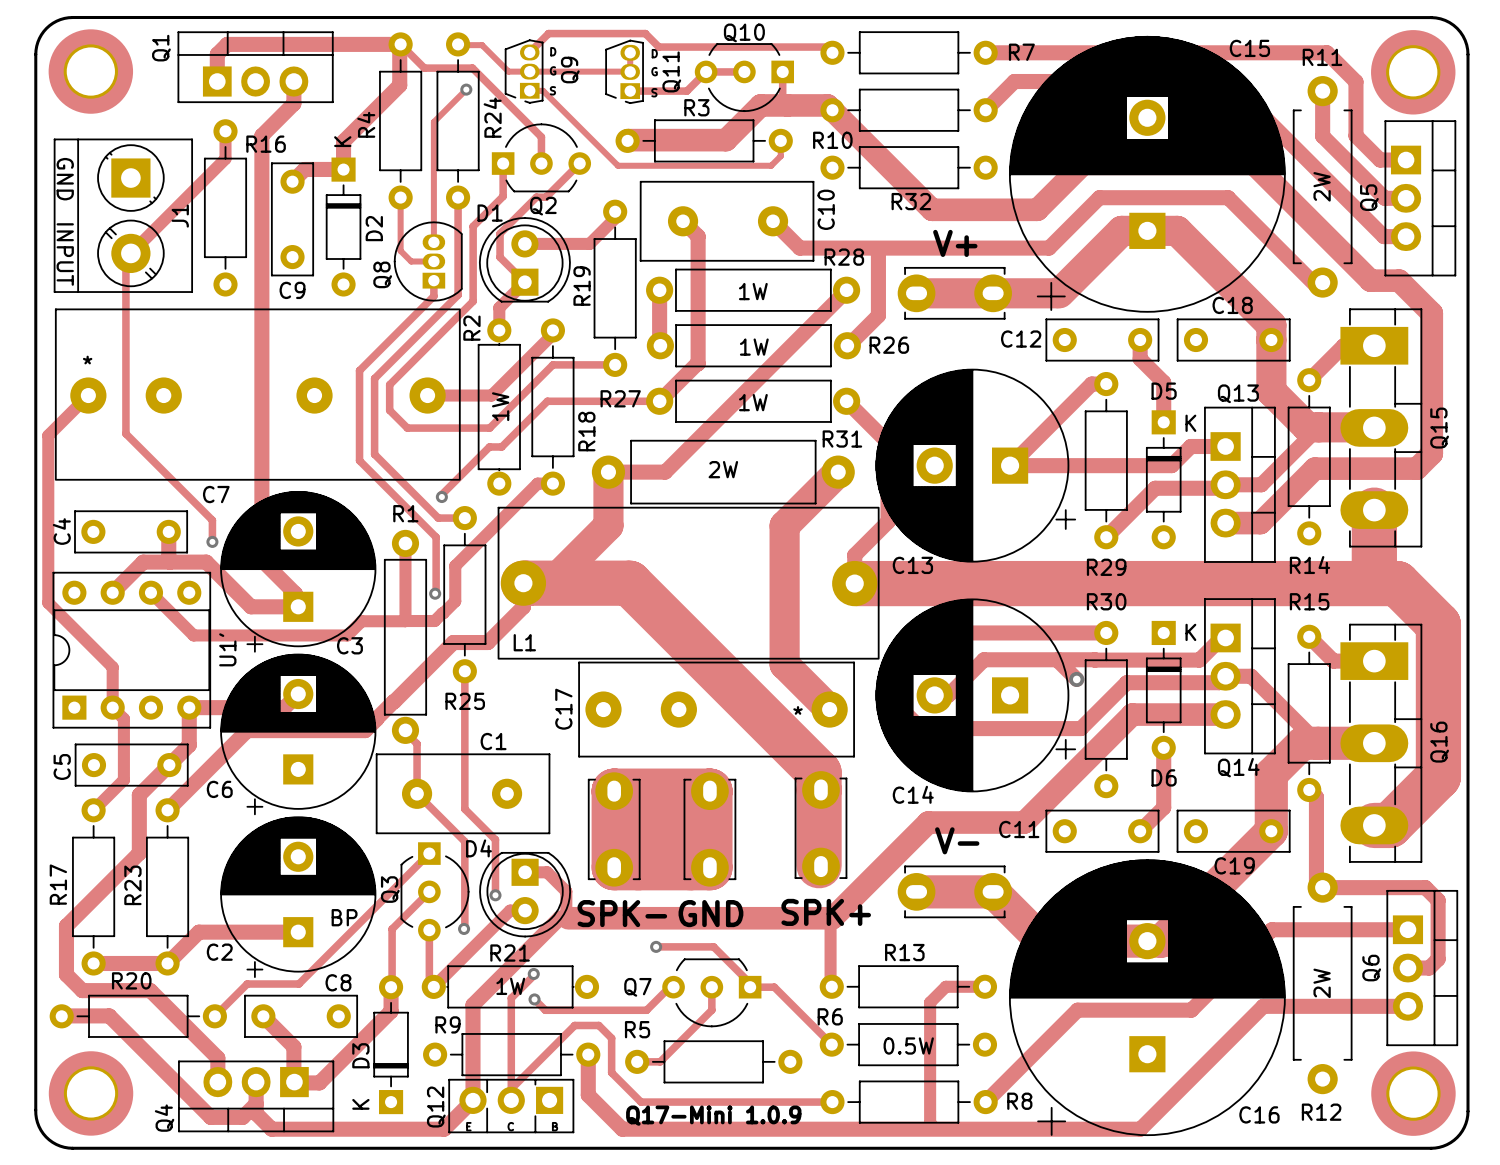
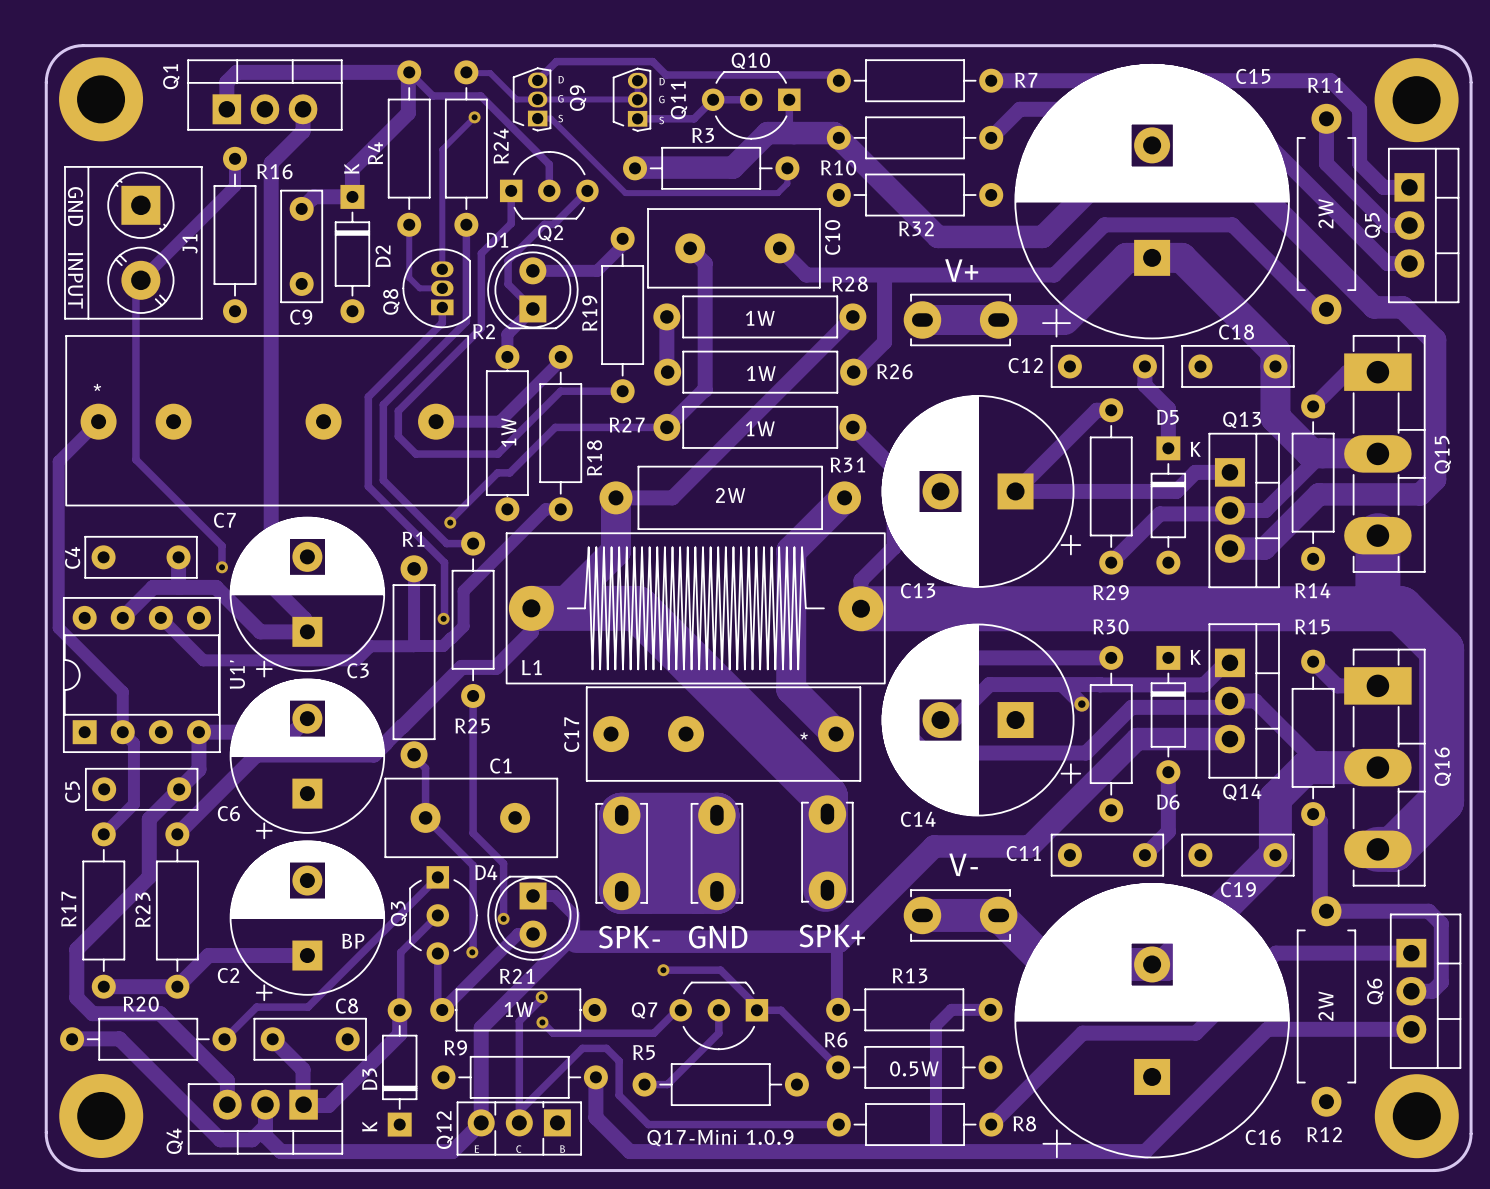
R2 name rotation: 0° (471, 328) -> 90° clockwise (484, 331)
L1 footprint: [497, 506, 880, 660] -> [505, 532, 886, 685]

